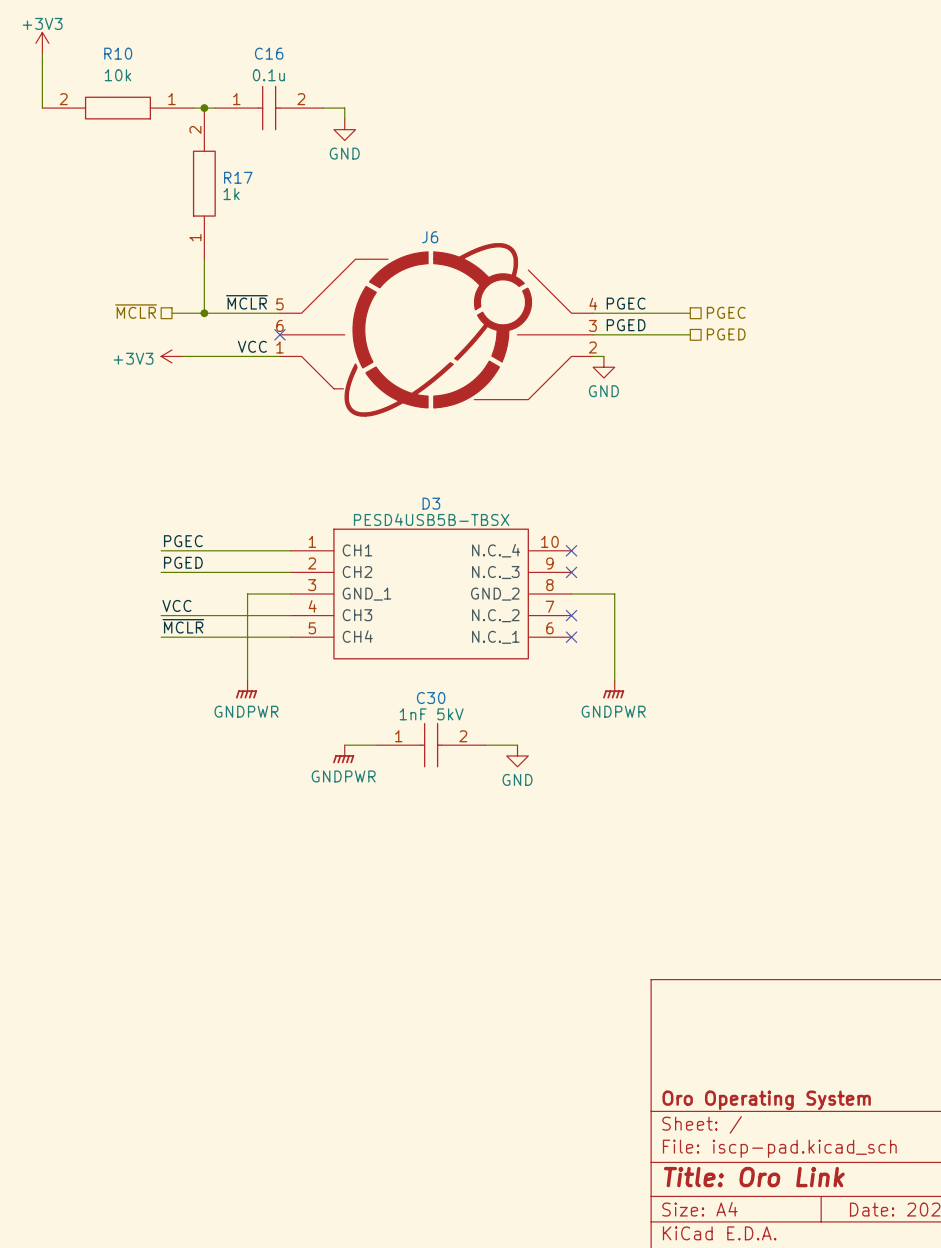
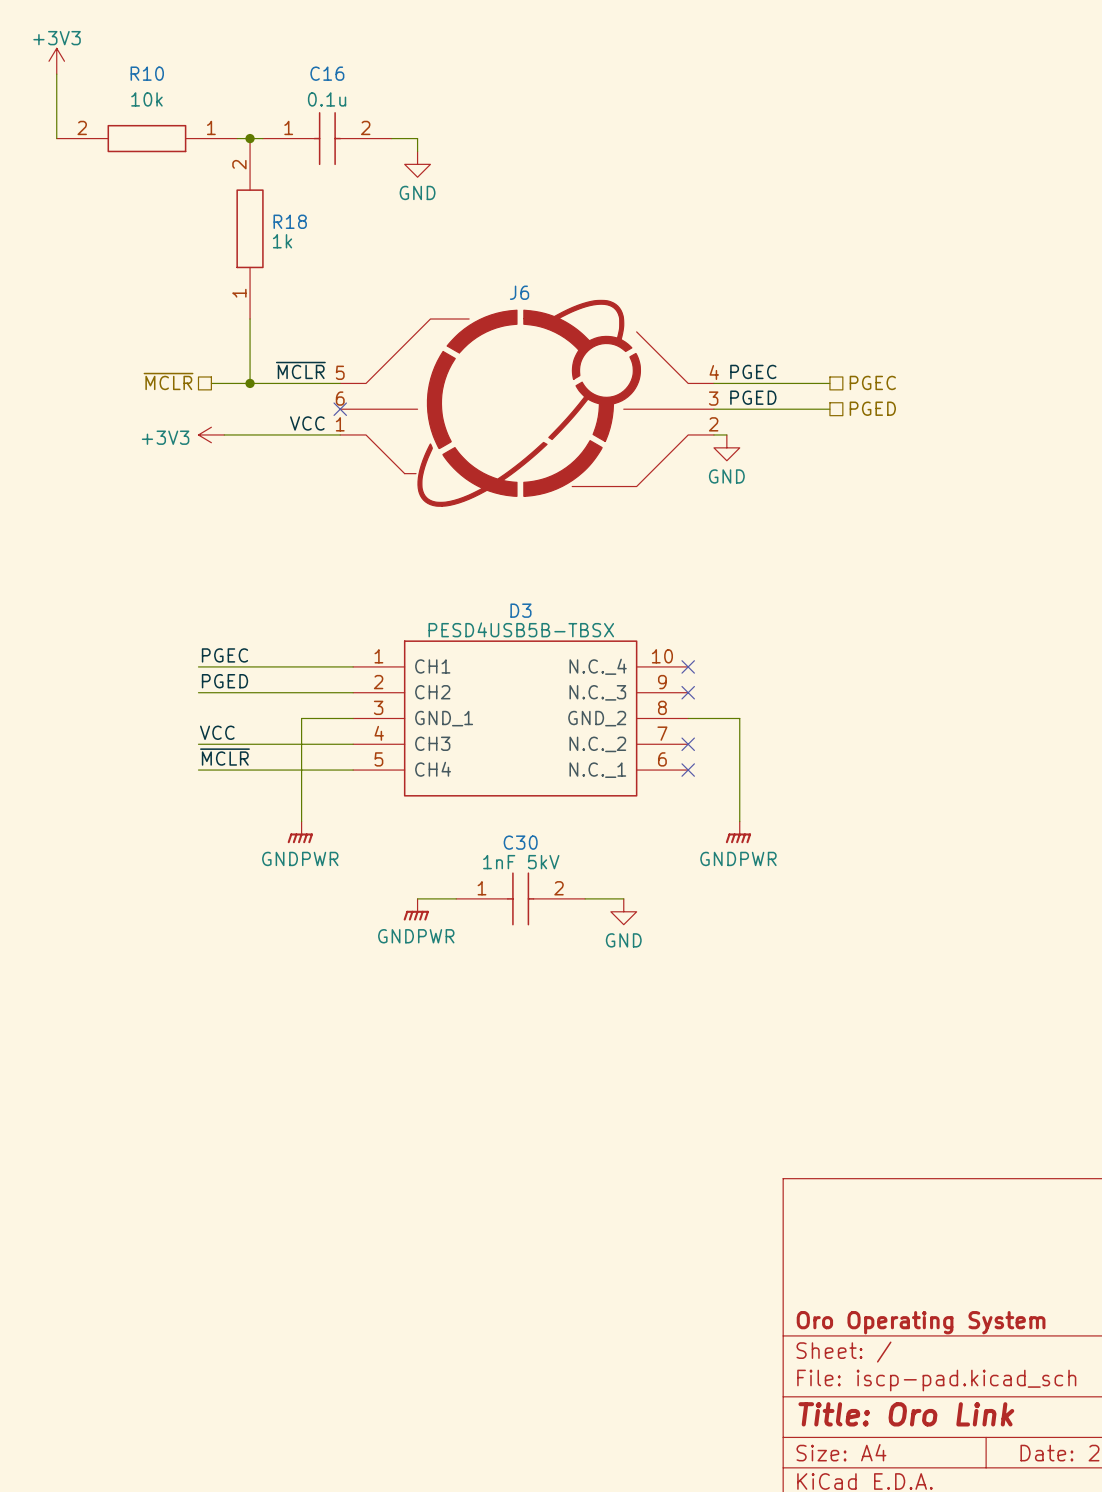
R17 name: R17 (238, 177) -> R18 (290, 221)

